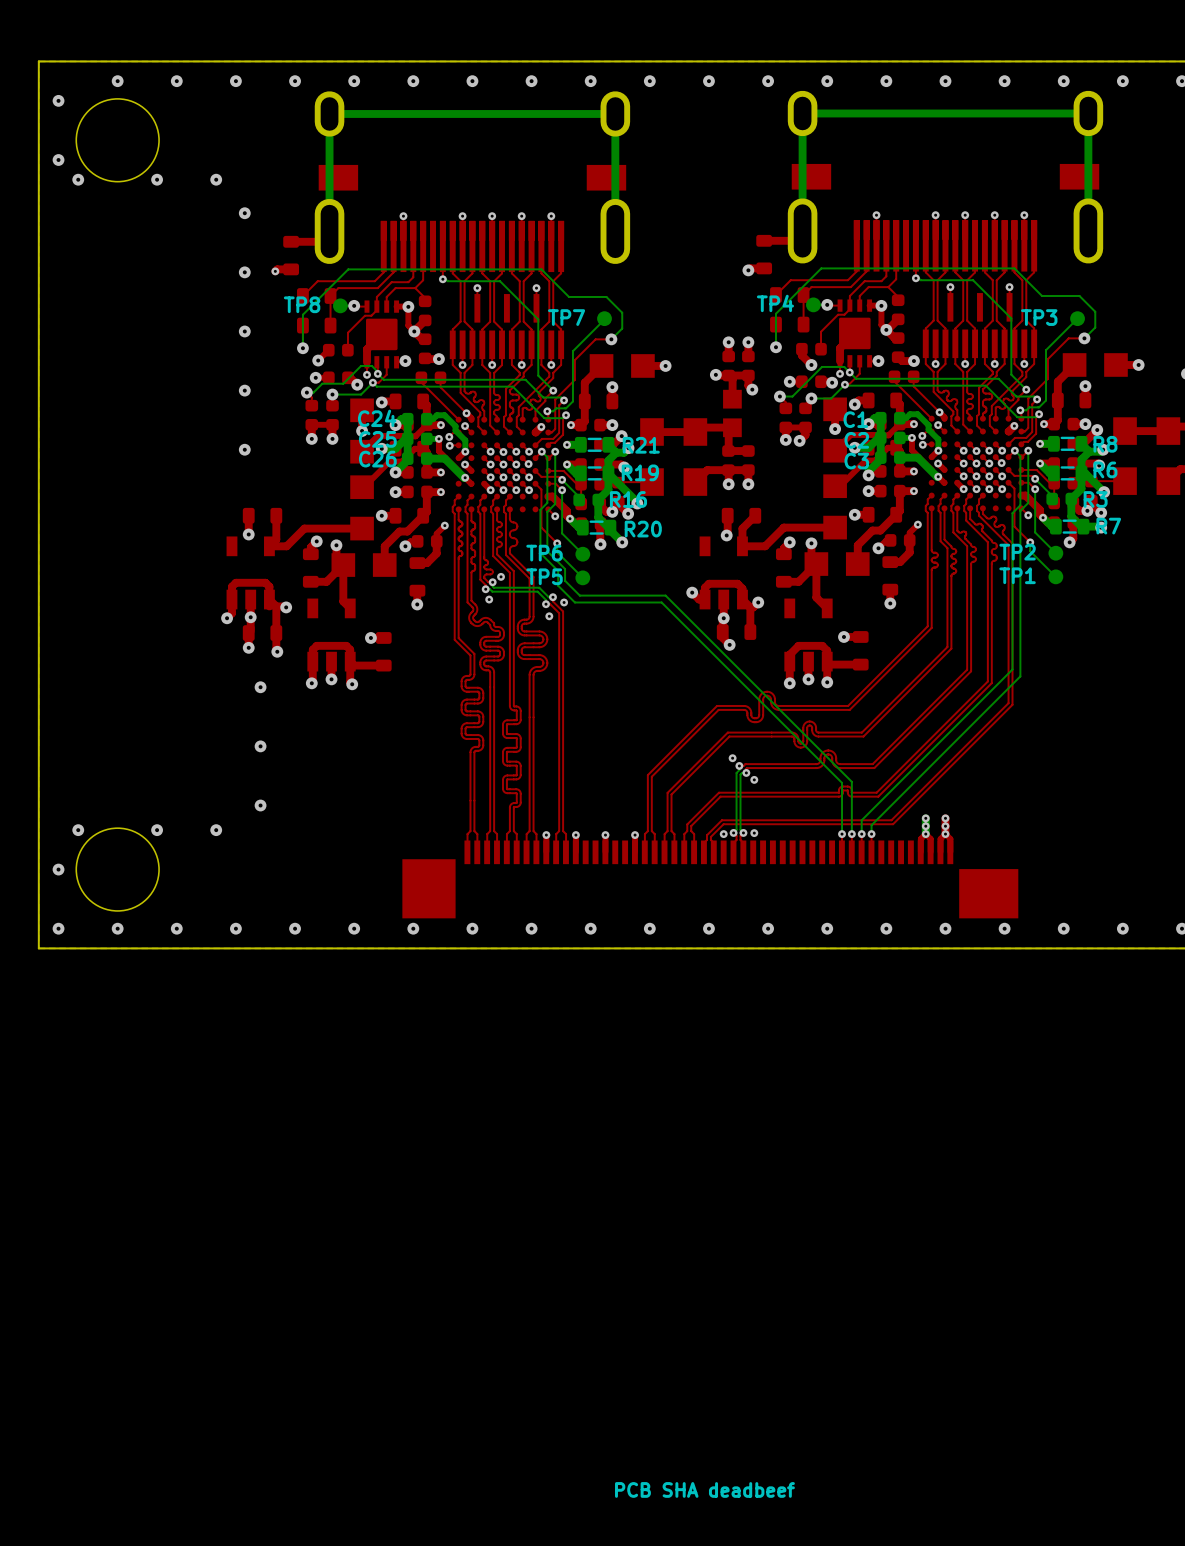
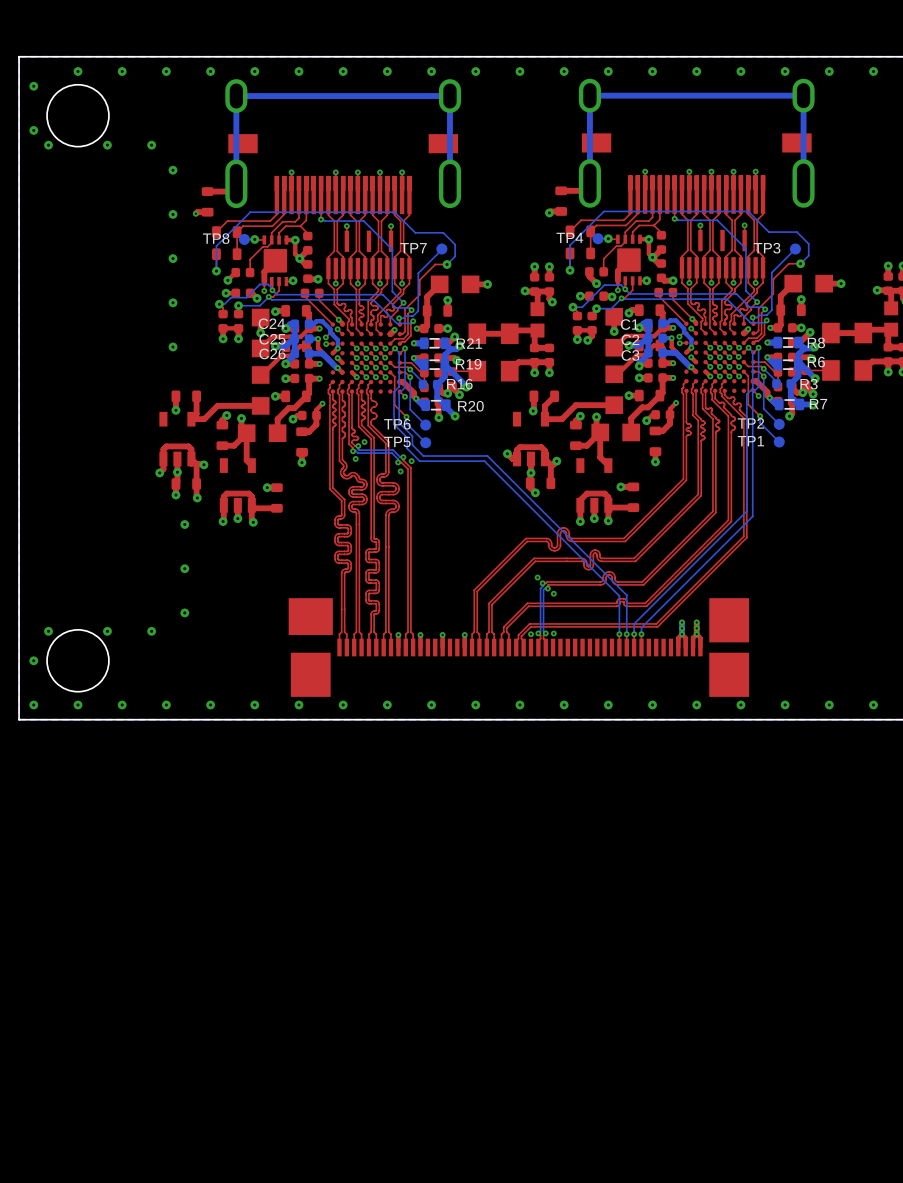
part: none -> (518, 647)
part: (710, 879) -> none
text: PCB SHA deadbeef (704, 1489) -> none

